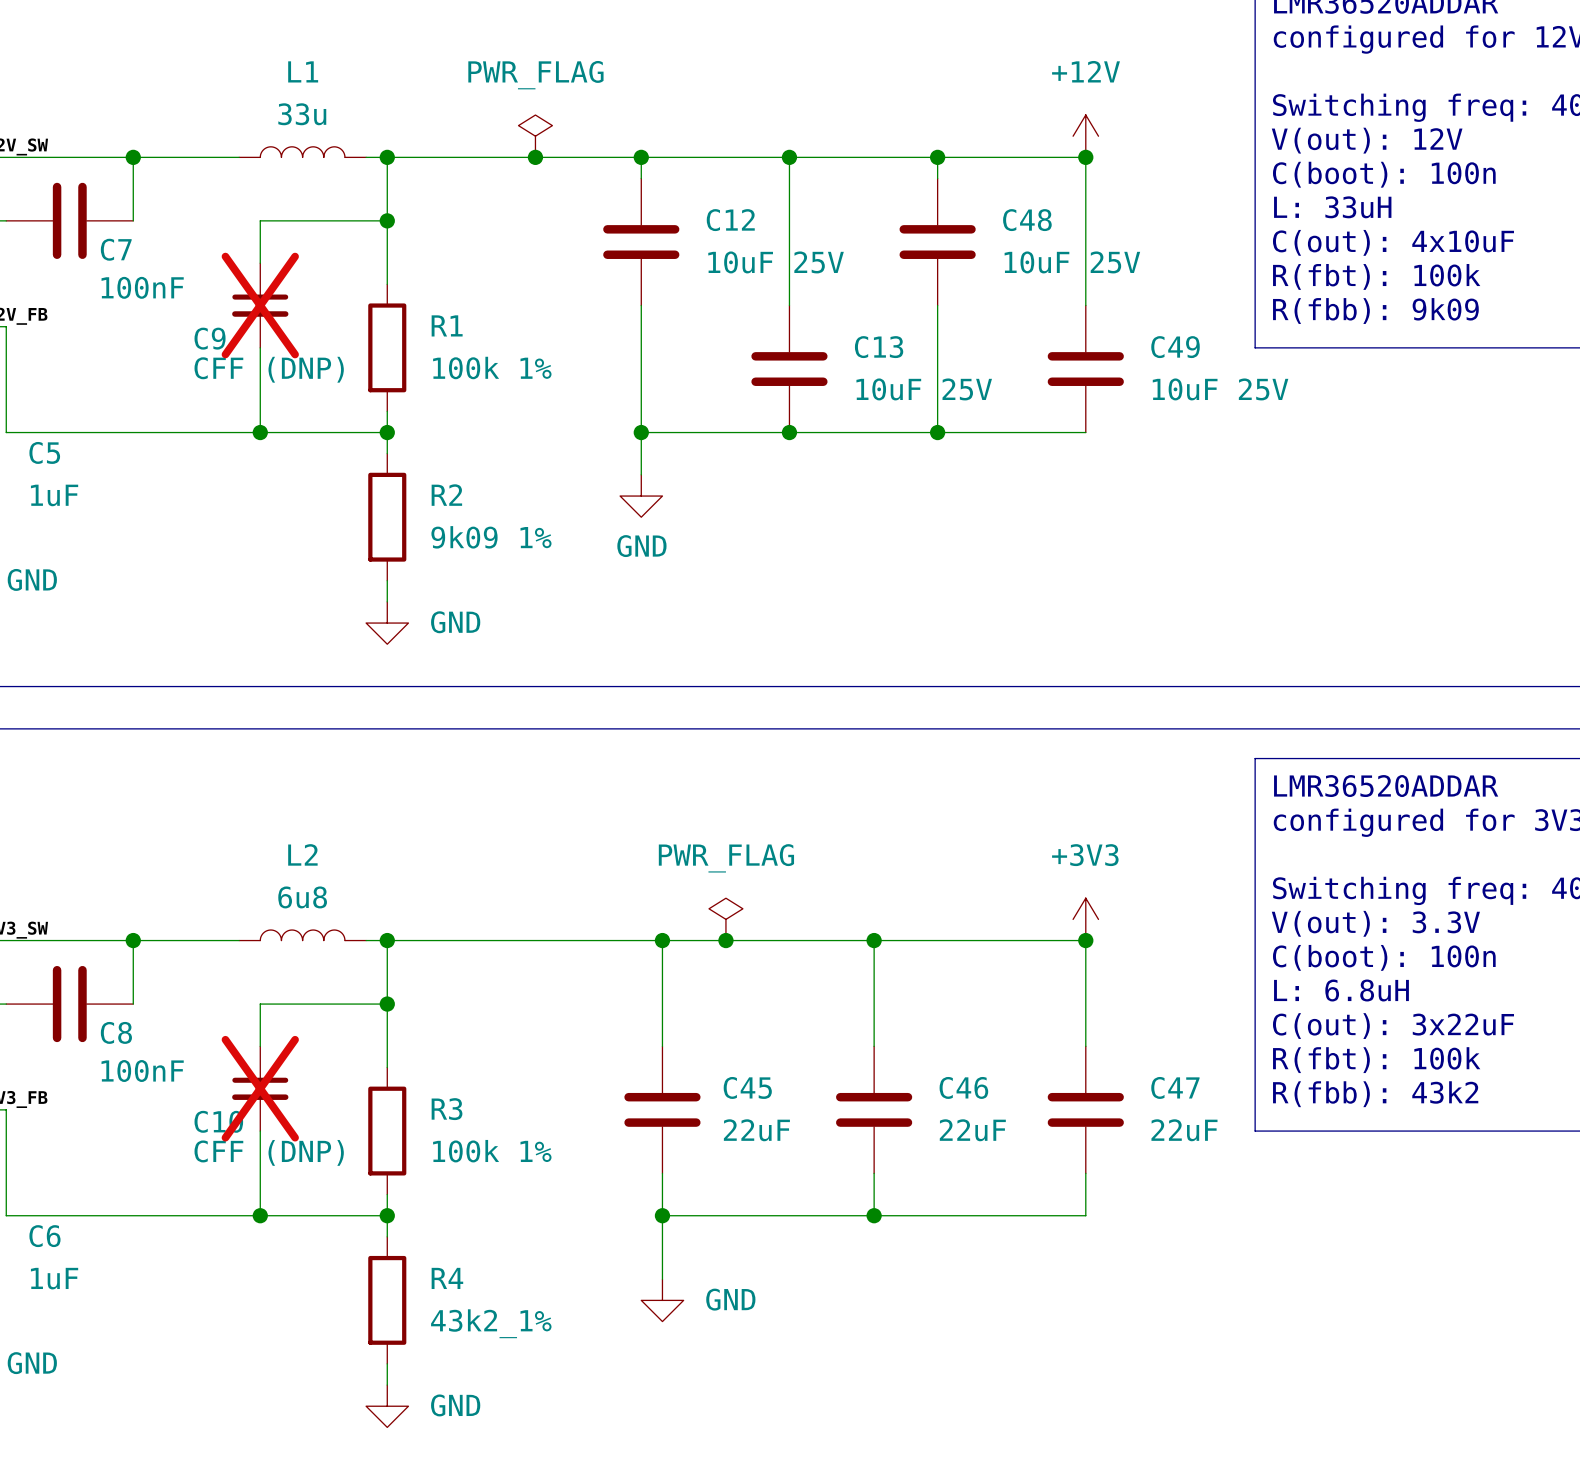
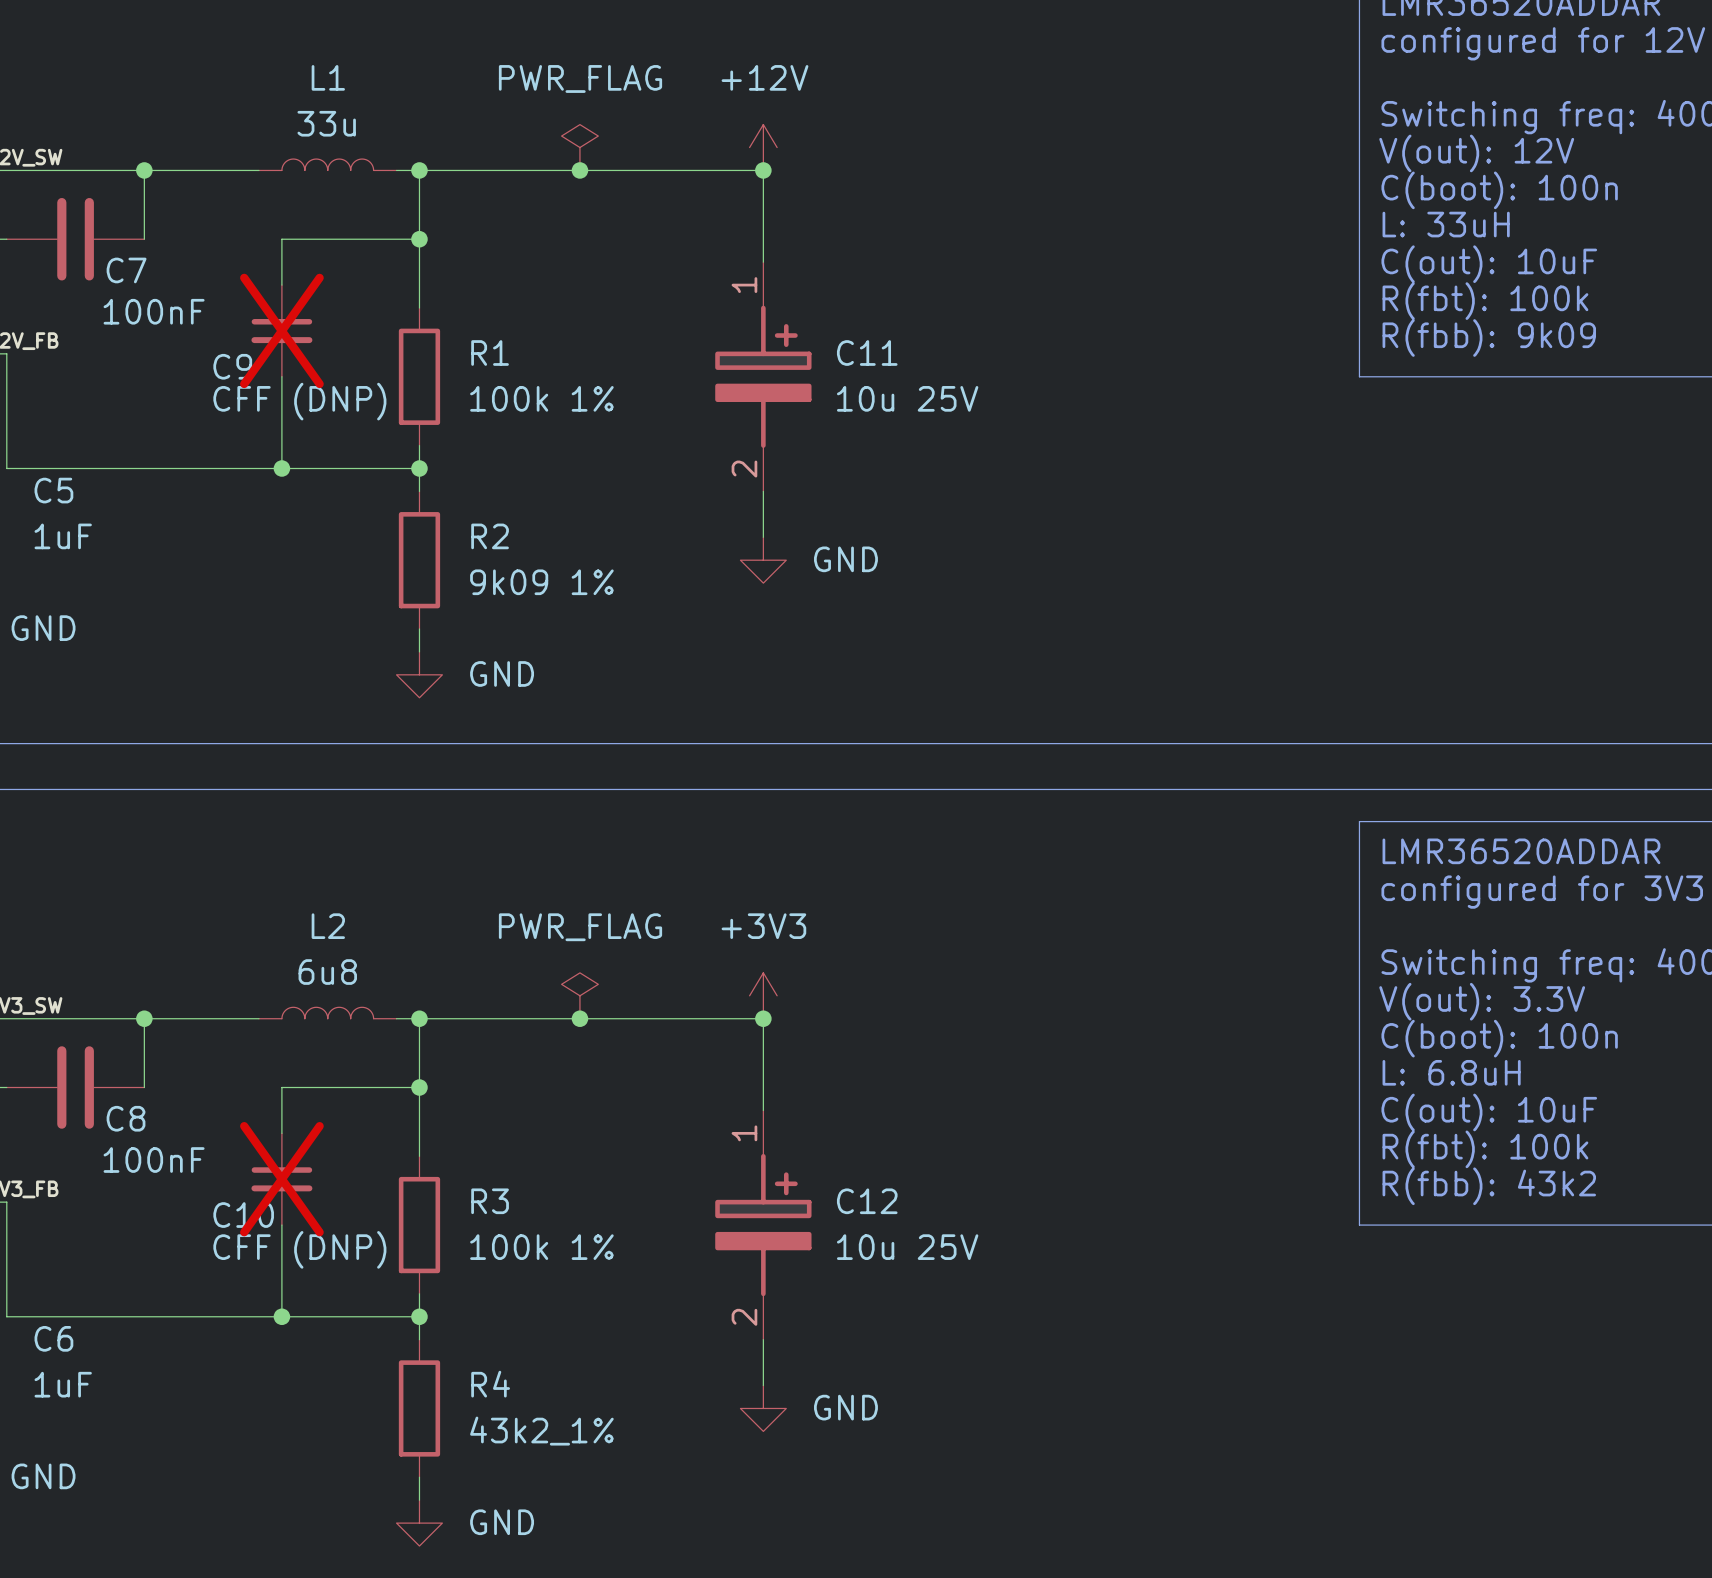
power symbol position: +12V (1085, 136) -> +12V (763, 147)
wire: (641, 157) (641, 178) -> none
junction: (641, 157) -> none
wire: (704, 157) (1085, 157) (1085, 305) -> (763, 170) (763, 262)
junction: none -> (763, 170)
wire: (789, 157) (789, 305) -> none
junction: (789, 157) -> none
wire: (937, 157) (937, 178) -> none
junction: (937, 157) -> none
junction: (1085, 157) -> none
C12 symbol: [603, 178, 680, 306] -> [715, 1110, 812, 1340]
C48: 10uF 25V (937, 242) -> none
text: C(out): 4x10uF (1393, 242) -> C(out): 10uF (1489, 264)
C12 value: 10uF 25V (776, 262) -> 10u 25V (907, 1247)
wire: (641, 305) (641, 474) -> none
wire: (937, 305) (937, 432) -> none
C11: none -> 10u 25V (763, 376)
C13: 10uF 25V (789, 369) -> none
C49: 10uF 25V (1085, 369) -> none
wire: (641, 432) (1085, 432) -> none
junction: (641, 432) -> none
junction: (789, 432) -> none
junction: (937, 432) -> none
wire: none -> (763, 491) (763, 537)
power symbol position: GND (641, 496) -> GND (763, 560)
power symbol text position: GND (641, 546) -> GND (845, 559)
power symbol position: PWR_FLAG (725, 919) -> PWR_FLAG (579, 995)
power symbol position: +3V3 (1085, 919) -> +3V3 (763, 995)
junction: none -> (579, 1018)
wire: (662, 940) (662, 1046) -> none
junction: (662, 940) -> none
wire: (704, 940) (1085, 940) (1085, 1046) -> (763, 1018) (763, 1110)
junction: none -> (763, 1018)
junction: (725, 940) -> none
wire: (874, 940) (874, 1046) -> none
junction: (874, 940) -> none
junction: (1085, 940) -> none
text: C(out): 3x22uF (1393, 1026) -> C(out): 10uF (1489, 1112)
C45: 22uF (662, 1109) -> none
C46: 22uF (874, 1109) -> none
C47: 22uF (1085, 1109) -> none
wire: (662, 1173) (662, 1279) -> none
wire: (874, 1173) (874, 1215) -> (763, 1339) (763, 1385)
wire: (1085, 1173) (1085, 1215) (662, 1215) -> none
junction: (662, 1215) -> none
junction: (874, 1215) -> none
power symbol position: GND (662, 1300) -> GND (763, 1408)

